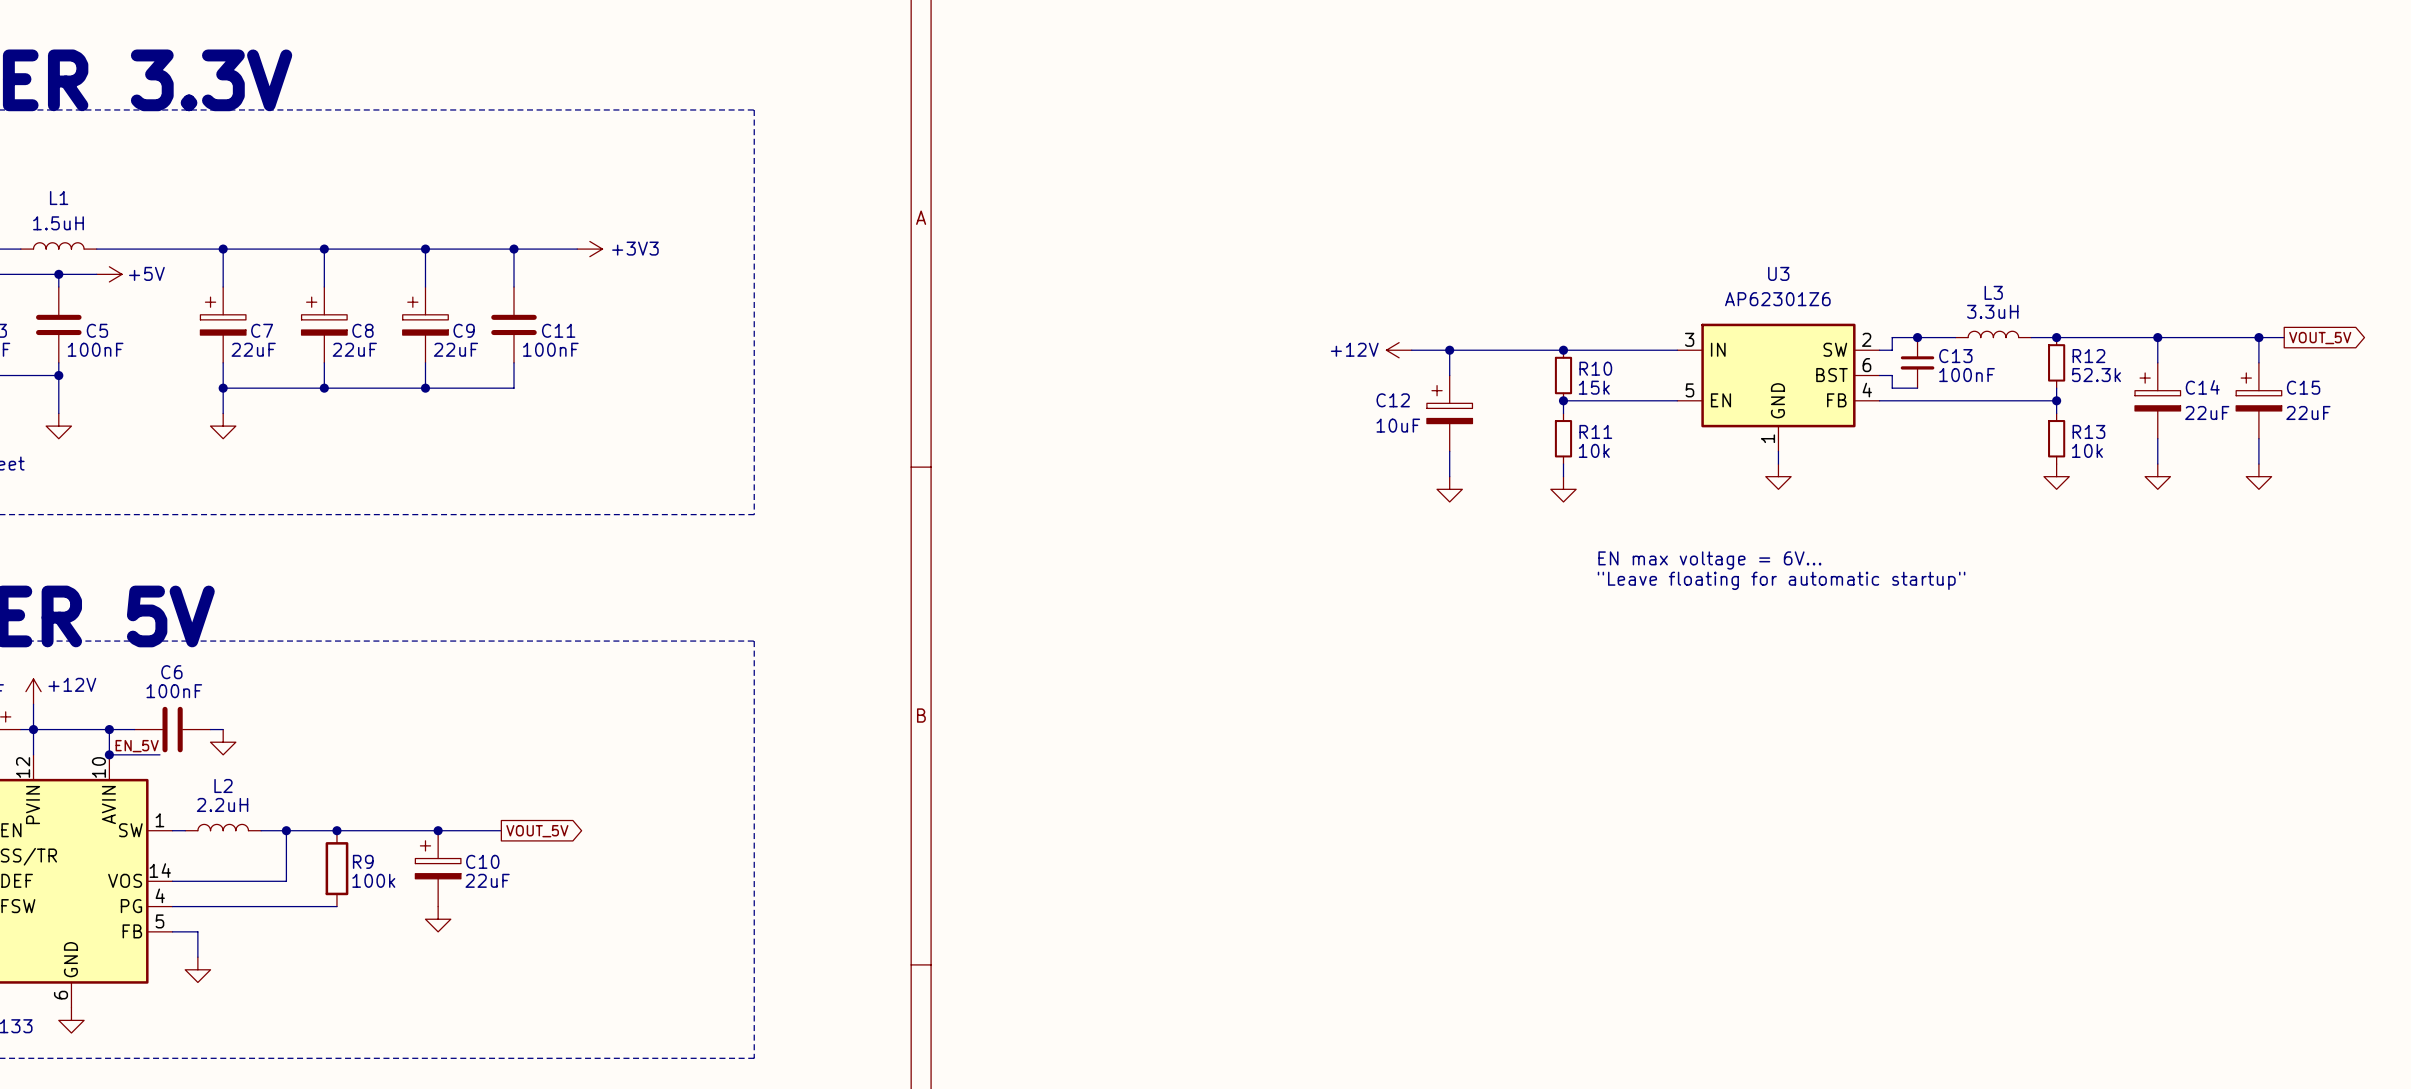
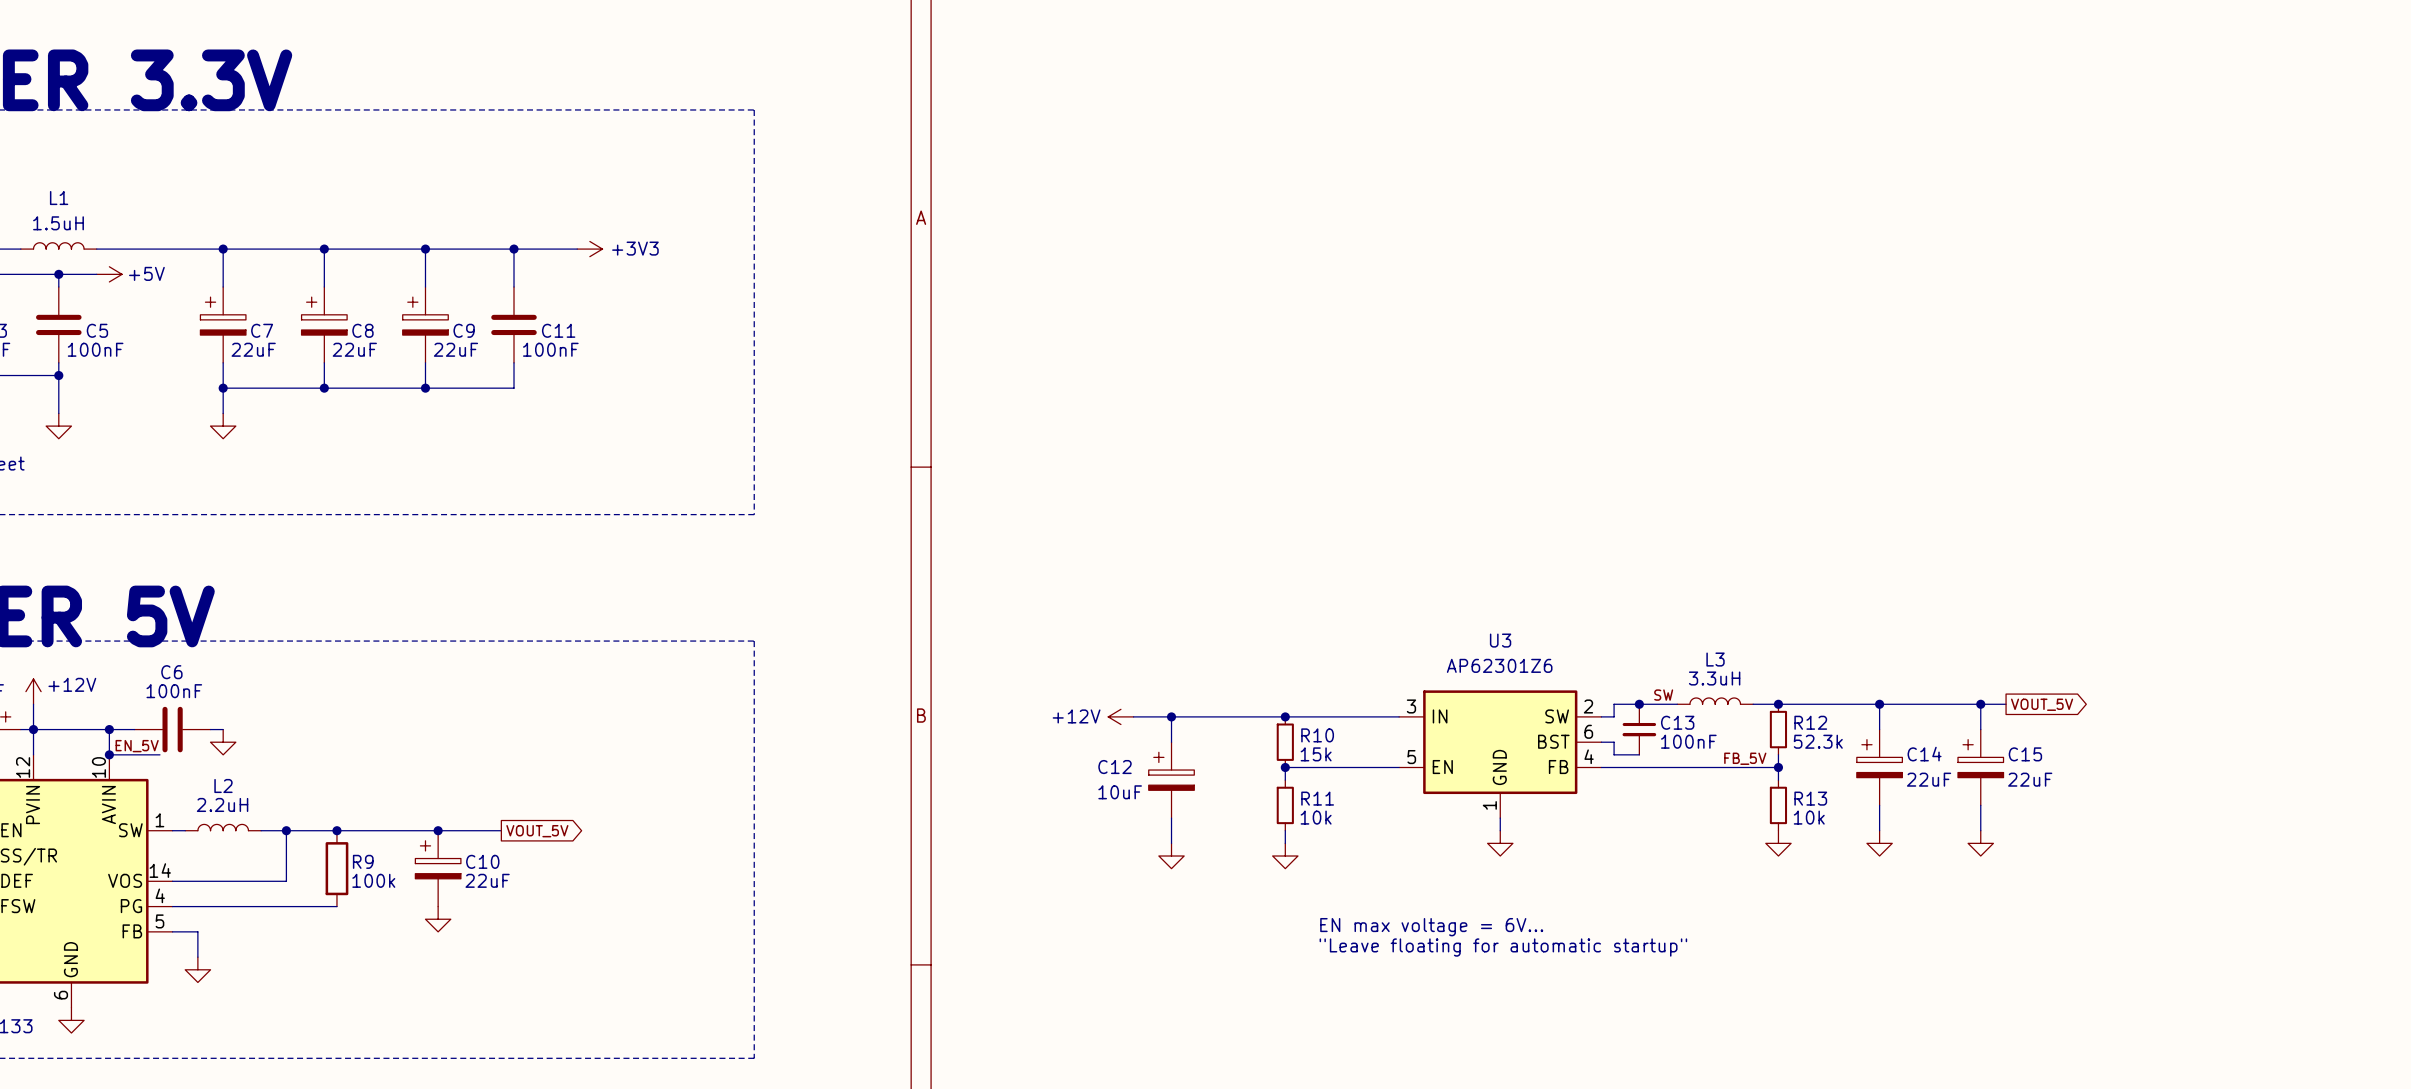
L3 position: (1993, 334) -> (1715, 701)
junction: (1917, 337) -> none
wire: (1955, 337) (1892, 337) (1892, 350) (1879, 350) -> none
wire: (2031, 337) (2284, 337) -> none
junction: (2056, 337) -> none
wire: (2157, 337) (2157, 362) -> none
junction: (2157, 337) -> none
wire: (2258, 337) (2258, 362) -> none
junction: (2258, 337) -> none
global label: VOUT_5V (2320, 338) -> none
power symbol: +12V (1399, 350) -> none
wire: (1411, 350) (1677, 350) -> none
wire: (1449, 350) (1449, 375) -> none
junction: (1449, 350) -> none
junction: (1563, 350) -> none
C13 position: (1917, 362) -> (1639, 729)
R12 position: (2056, 362) -> (1778, 729)
R10 position: (1563, 375) -> (1285, 742)
wire: (1879, 375) (1892, 375) (1892, 388) (1917, 388) -> none
U3 position: (1778, 387) -> (1500, 754)
wire: (2056, 388) (2056, 413) -> none
junction: (1563, 400) -> none
wire: (1677, 400) (1563, 400) (1563, 413) -> none
wire: (1879, 400) (2056, 400) -> none
junction: (2056, 400) -> none
C14 position: (2157, 400) -> (1879, 767)
C15 position: (2258, 400) -> (1980, 767)
C12 position: (1449, 413) -> (1171, 780)
R11 position: (1563, 438) -> (1285, 805)
R13 position: (2056, 438) -> (1778, 805)
wire: (2157, 438) (2157, 464) -> none
wire: (2258, 438) (2258, 464) -> none
wire: (1449, 451) (1449, 476) -> none
wire: (1778, 451) (1778, 464) -> none
wire: (1563, 464) (1563, 476) -> none
power symbol: (1778, 476) -> none
power symbol: (2056, 476) -> none
power symbol: (2157, 476) -> none
power symbol: (2258, 476) -> none
power symbol: (1449, 489) -> none
power symbol: (1563, 489) -> none
text: EN max voltage = 6V... (1709, 560) -> none
text: "Leave floating for automatic startup" (1781, 580) -> none
label: none -> SW (1663, 695)
junction: none -> (1639, 704)
wire: none -> (1677, 704) (1614, 704) (1614, 716) (1601, 716)
wire: none -> (1753, 704) (2006, 704)
junction: none -> (1778, 704)
wire: none -> (1879, 704) (1879, 729)
junction: none -> (1879, 704)
wire: none -> (1980, 704) (1980, 729)
junction: none -> (1980, 704)
global label: none -> VOUT_5V (2042, 704)
power symbol: none -> +12V (1120, 716)
wire: none -> (1133, 716) (1399, 716)
wire: none -> (1171, 716) (1171, 742)
junction: none -> (1171, 716)
junction: none -> (1285, 716)
wire: none -> (1601, 742) (1614, 742) (1614, 754) (1639, 754)
wire: none -> (1778, 754) (1778, 780)
label: none -> FB_5V (1745, 758)
junction: none -> (1285, 767)
wire: none -> (1399, 767) (1285, 767) (1285, 780)
wire: none -> (1601, 767) (1778, 767)
junction: none -> (1778, 767)
wire: none -> (1879, 805) (1879, 830)
wire: none -> (1980, 805) (1980, 830)
wire: none -> (1171, 818) (1171, 843)
wire: none -> (1500, 818) (1500, 830)
wire: none -> (1285, 830) (1285, 843)
power symbol: none -> (1500, 843)
power symbol: none -> (1778, 843)
power symbol: none -> (1879, 843)
power symbol: none -> (1980, 843)
power symbol: none -> (1171, 856)
power symbol: none -> (1285, 856)
text: none -> EN max voltage = 6V... (1431, 927)
text: none -> "Leave floating for automatic startup" (1503, 947)

